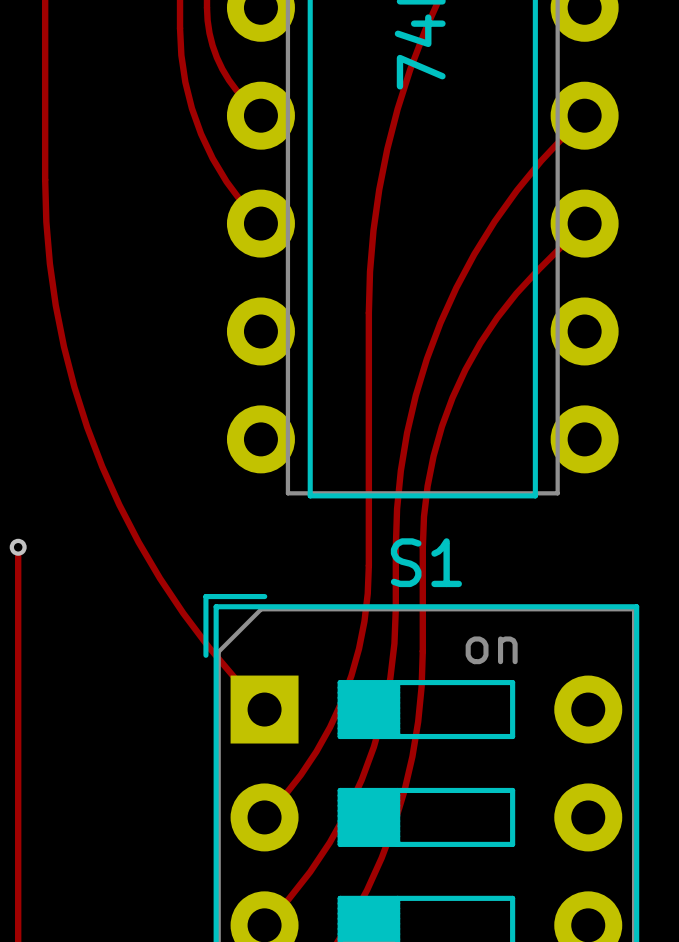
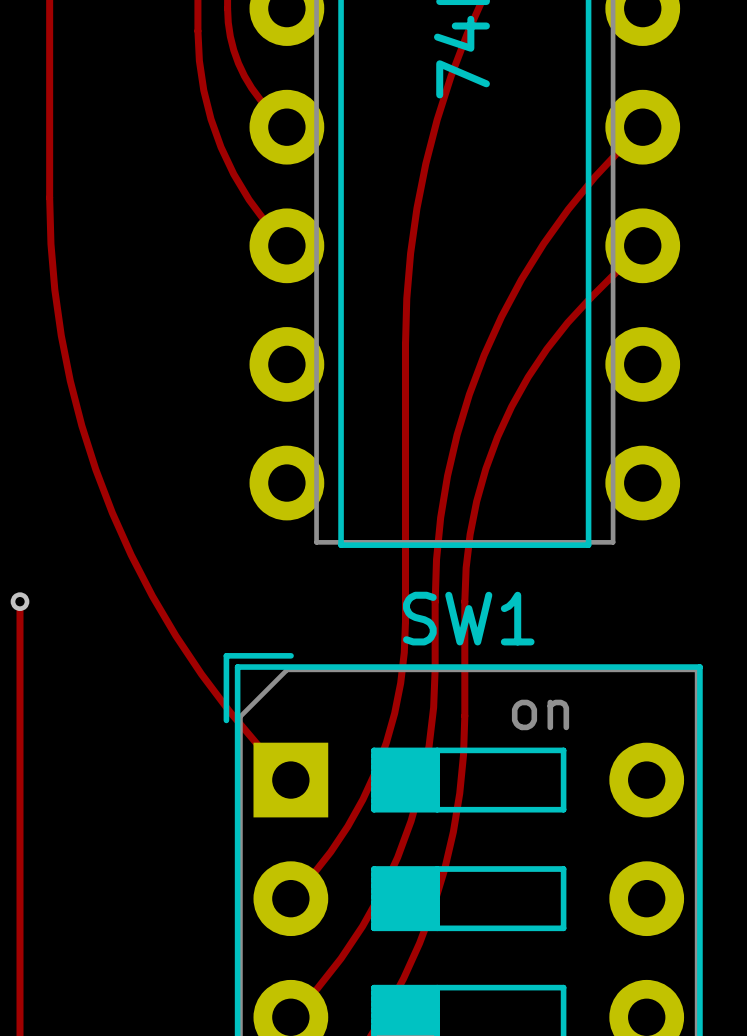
S1 name: S1 (426, 562) -> SW1 (468, 618)

